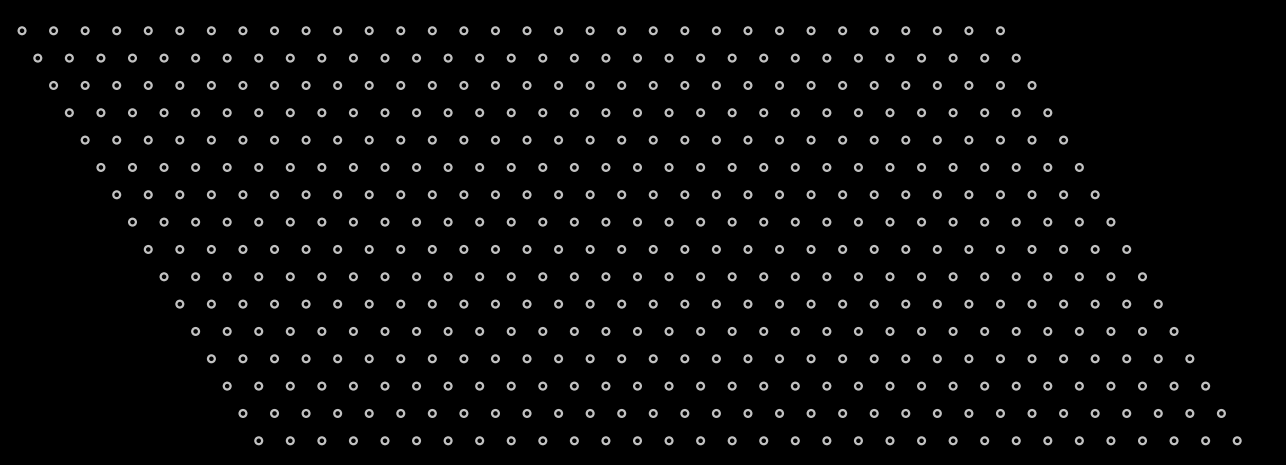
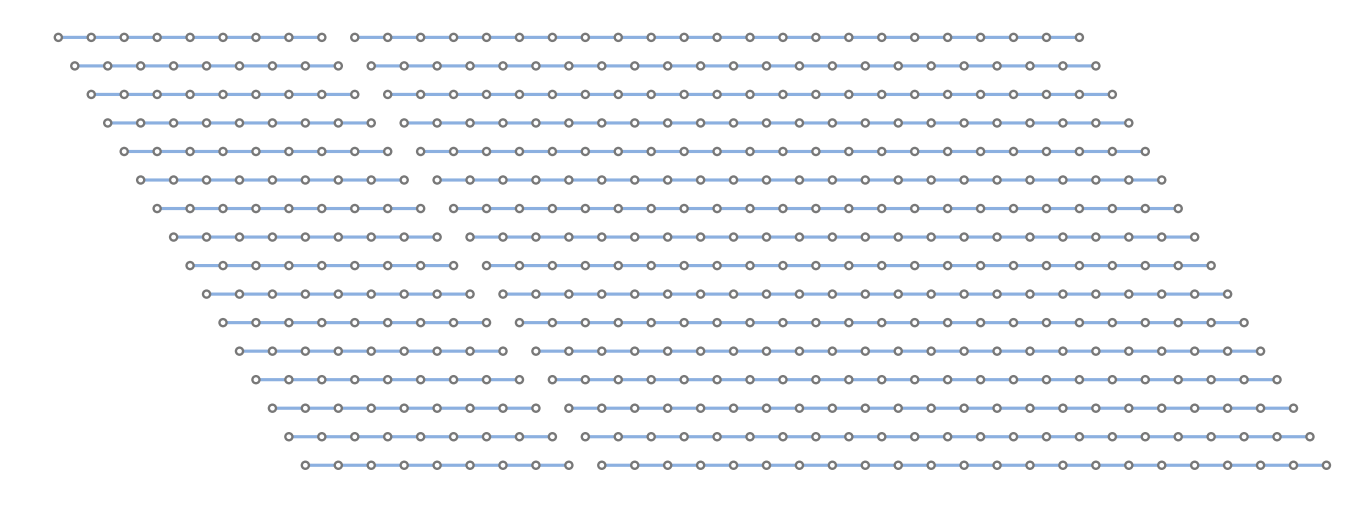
track: none -> (321, 37) (58, 37)
track: none -> (1079, 37) (354, 37)
track: none -> (338, 65) (74, 65)
track: none -> (1095, 65) (371, 65)
track: none -> (354, 94) (91, 94)
track: none -> (1112, 94) (387, 94)
track: none -> (371, 122) (107, 122)
track: none -> (1128, 122) (404, 122)
track: none -> (387, 151) (124, 151)
track: none -> (1145, 151) (420, 151)
track: none -> (404, 180) (140, 180)
track: none -> (1161, 180) (437, 180)
track: none -> (420, 208) (157, 208)
track: none -> (1178, 208) (453, 208)
track: none -> (437, 237) (173, 237)
track: none -> (1194, 237) (470, 237)
track: none -> (453, 265) (190, 265)
track: none -> (1211, 265) (486, 265)
track: none -> (470, 294) (206, 294)
track: none -> (1227, 294) (502, 294)
track: none -> (486, 322) (223, 322)
track: none -> (1244, 322) (519, 322)
track: none -> (502, 351) (239, 351)
track: none -> (1260, 351) (535, 351)
track: none -> (519, 379) (255, 379)
track: none -> (1277, 379) (552, 379)
track: none -> (535, 408) (272, 408)
track: none -> (1293, 408) (568, 408)
track: none -> (552, 436) (288, 436)
track: none -> (1309, 436) (585, 436)
track: none -> (568, 465) (305, 465)
track: none -> (1326, 465) (601, 465)

